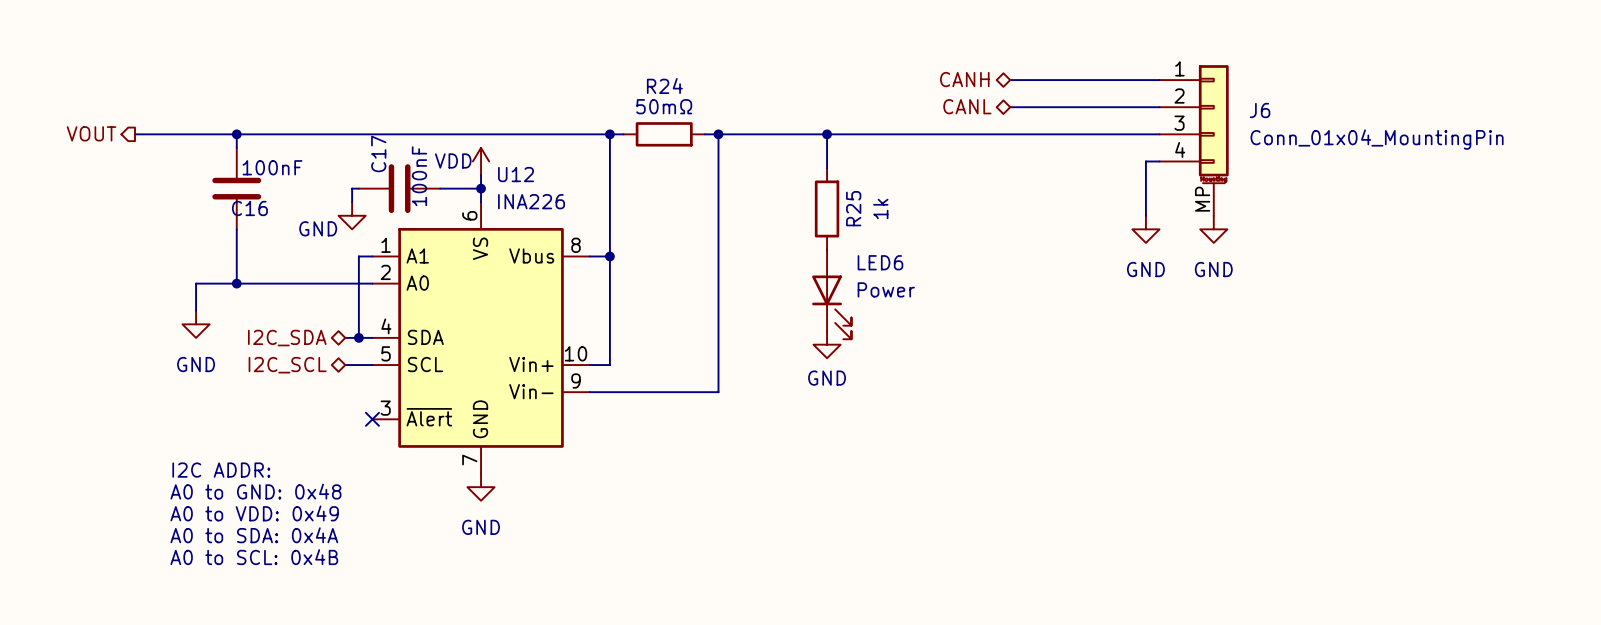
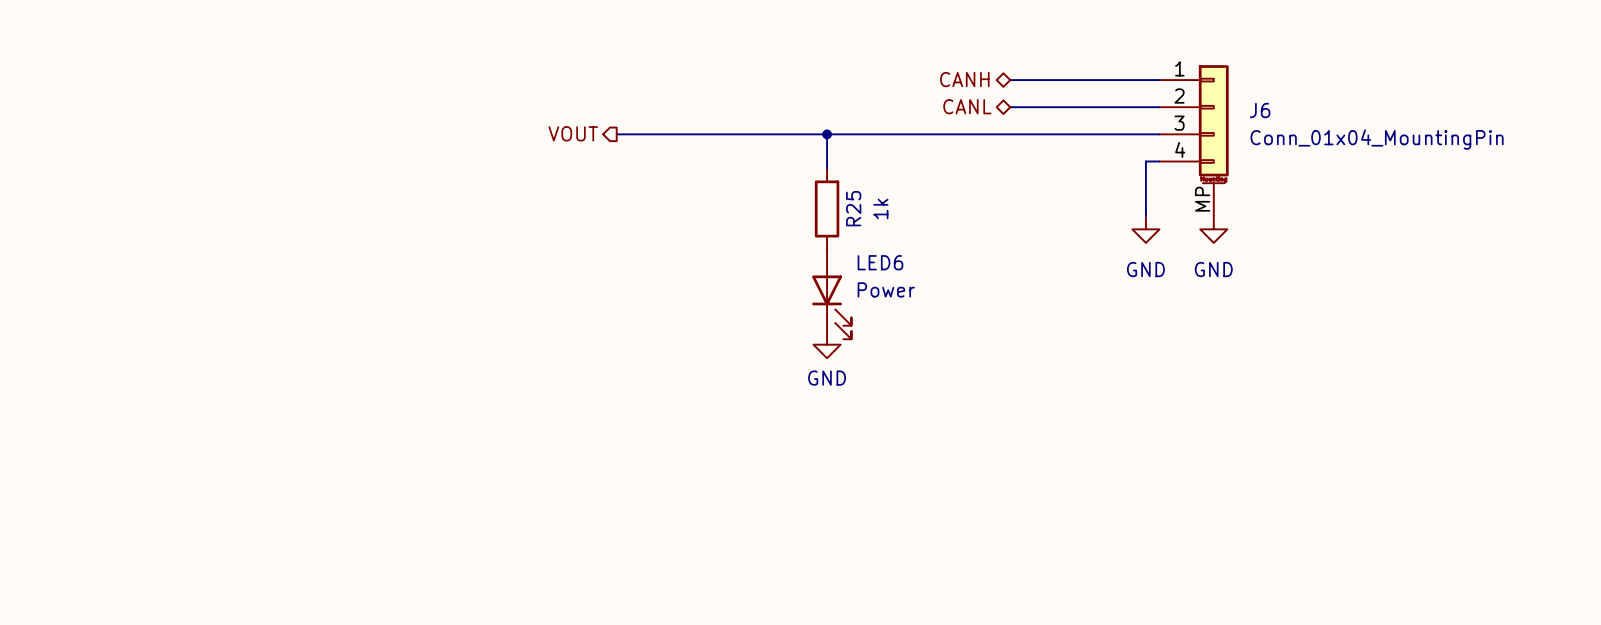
hierarchical label: VOUT (91, 133) -> none
hierarchical label: none -> VOUT (573, 133)
wire: (134, 134) (616, 134) -> none
wire: (236, 134) (236, 147) -> none
junction: (236, 134) -> none
wire: (609, 134) (609, 365) (589, 365) -> none
junction: (609, 134) -> none
wire: none -> (623, 134) (704, 134)
R24: 50mΩ (664, 134) -> none
wire: (718, 134) (718, 392) (589, 392) -> none
junction: (718, 134) -> none
power symbol: VDD (481, 161) -> none
wire: (481, 175) (481, 202) -> none
C16: 100nF (236, 188) -> none
wire: (358, 188) (352, 188) (352, 202) -> none
C17: 100nF (399, 188) -> none
wire: (440, 188) (481, 188) -> none
junction: (481, 188) -> none
power symbol: GND (352, 215) -> none
wire: (236, 229) (236, 283) -> none
wire: (372, 256) (358, 256) (358, 337) -> none
wire: (589, 256) (609, 256) -> none
junction: (609, 256) -> none
junction: (236, 283) -> none
wire: (372, 283) (196, 283) (196, 310) -> none
power symbol: GND (196, 324) -> none
wire: (345, 337) (372, 337) -> none
junction: (358, 337) -> none
U12: INA226 (481, 337) -> none
hierarchical label: I2C_SDA (287, 338) -> none
hierarchical label: I2C_SCL (287, 365) -> none
wire: (345, 365) (372, 365) -> none
no-connect mark: (372, 419) -> none
text: I2C ADDR: (221, 470) -> none
power symbol: GND (481, 487) -> none
text: A0 to GND: 0x48 (255, 491) -> none
text: A0 to VDD: 0x49 (254, 513) -> none
text: A0 to SDA: 0x4A (254, 535) -> none
text: A0 to SCL: 0x4B (254, 557) -> none

